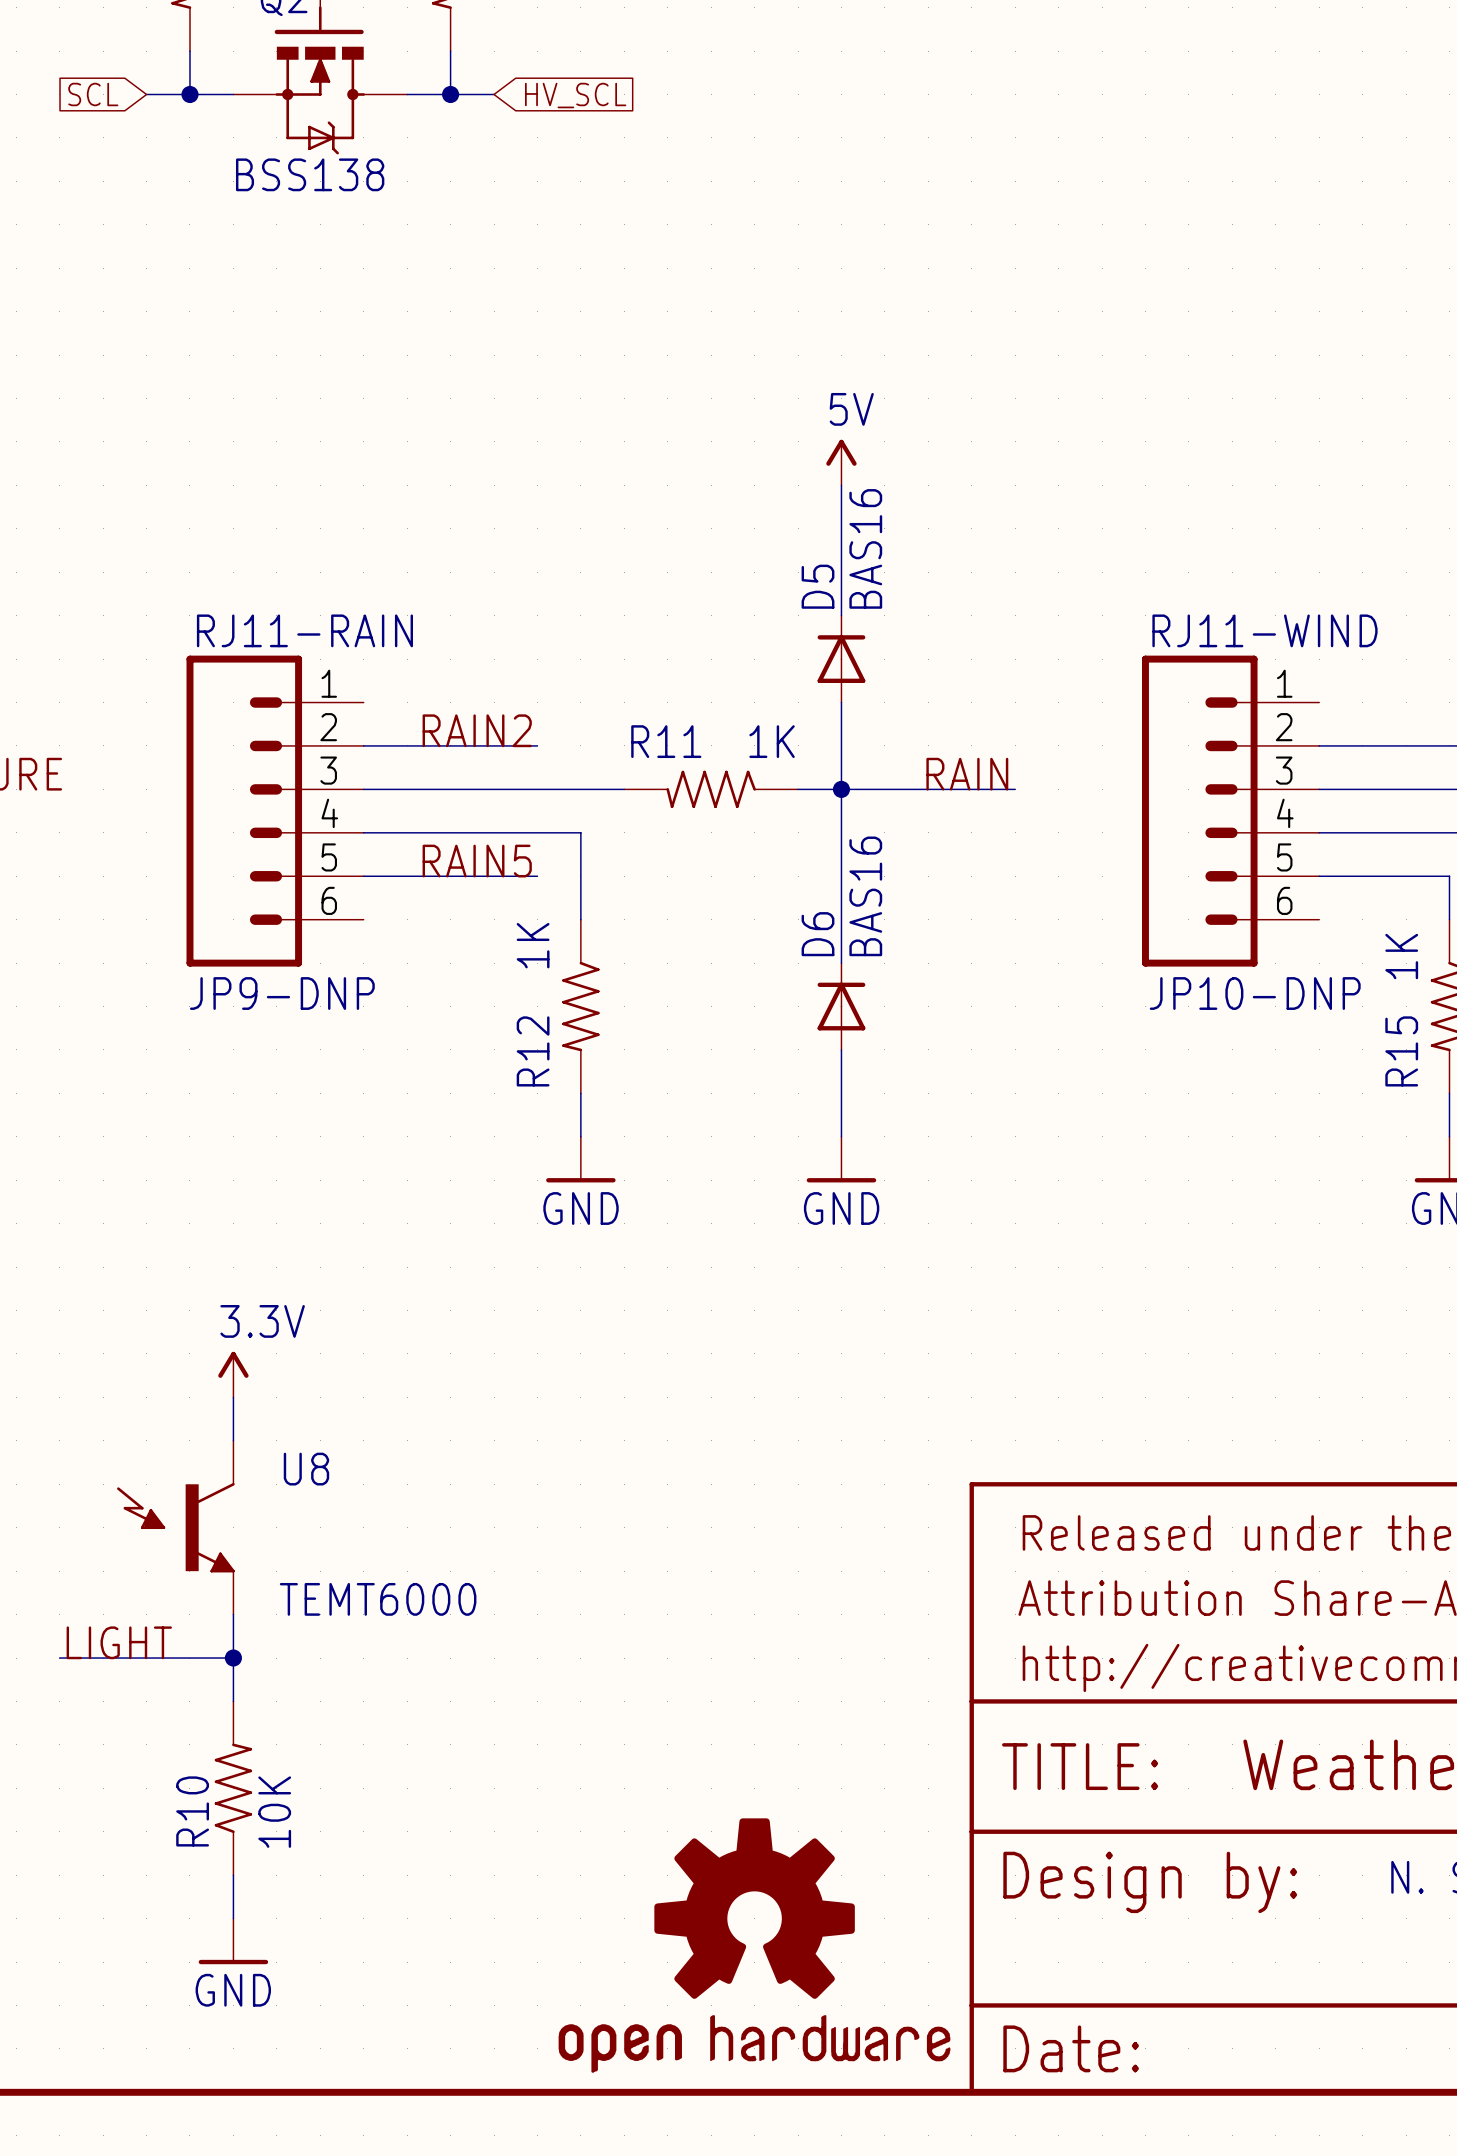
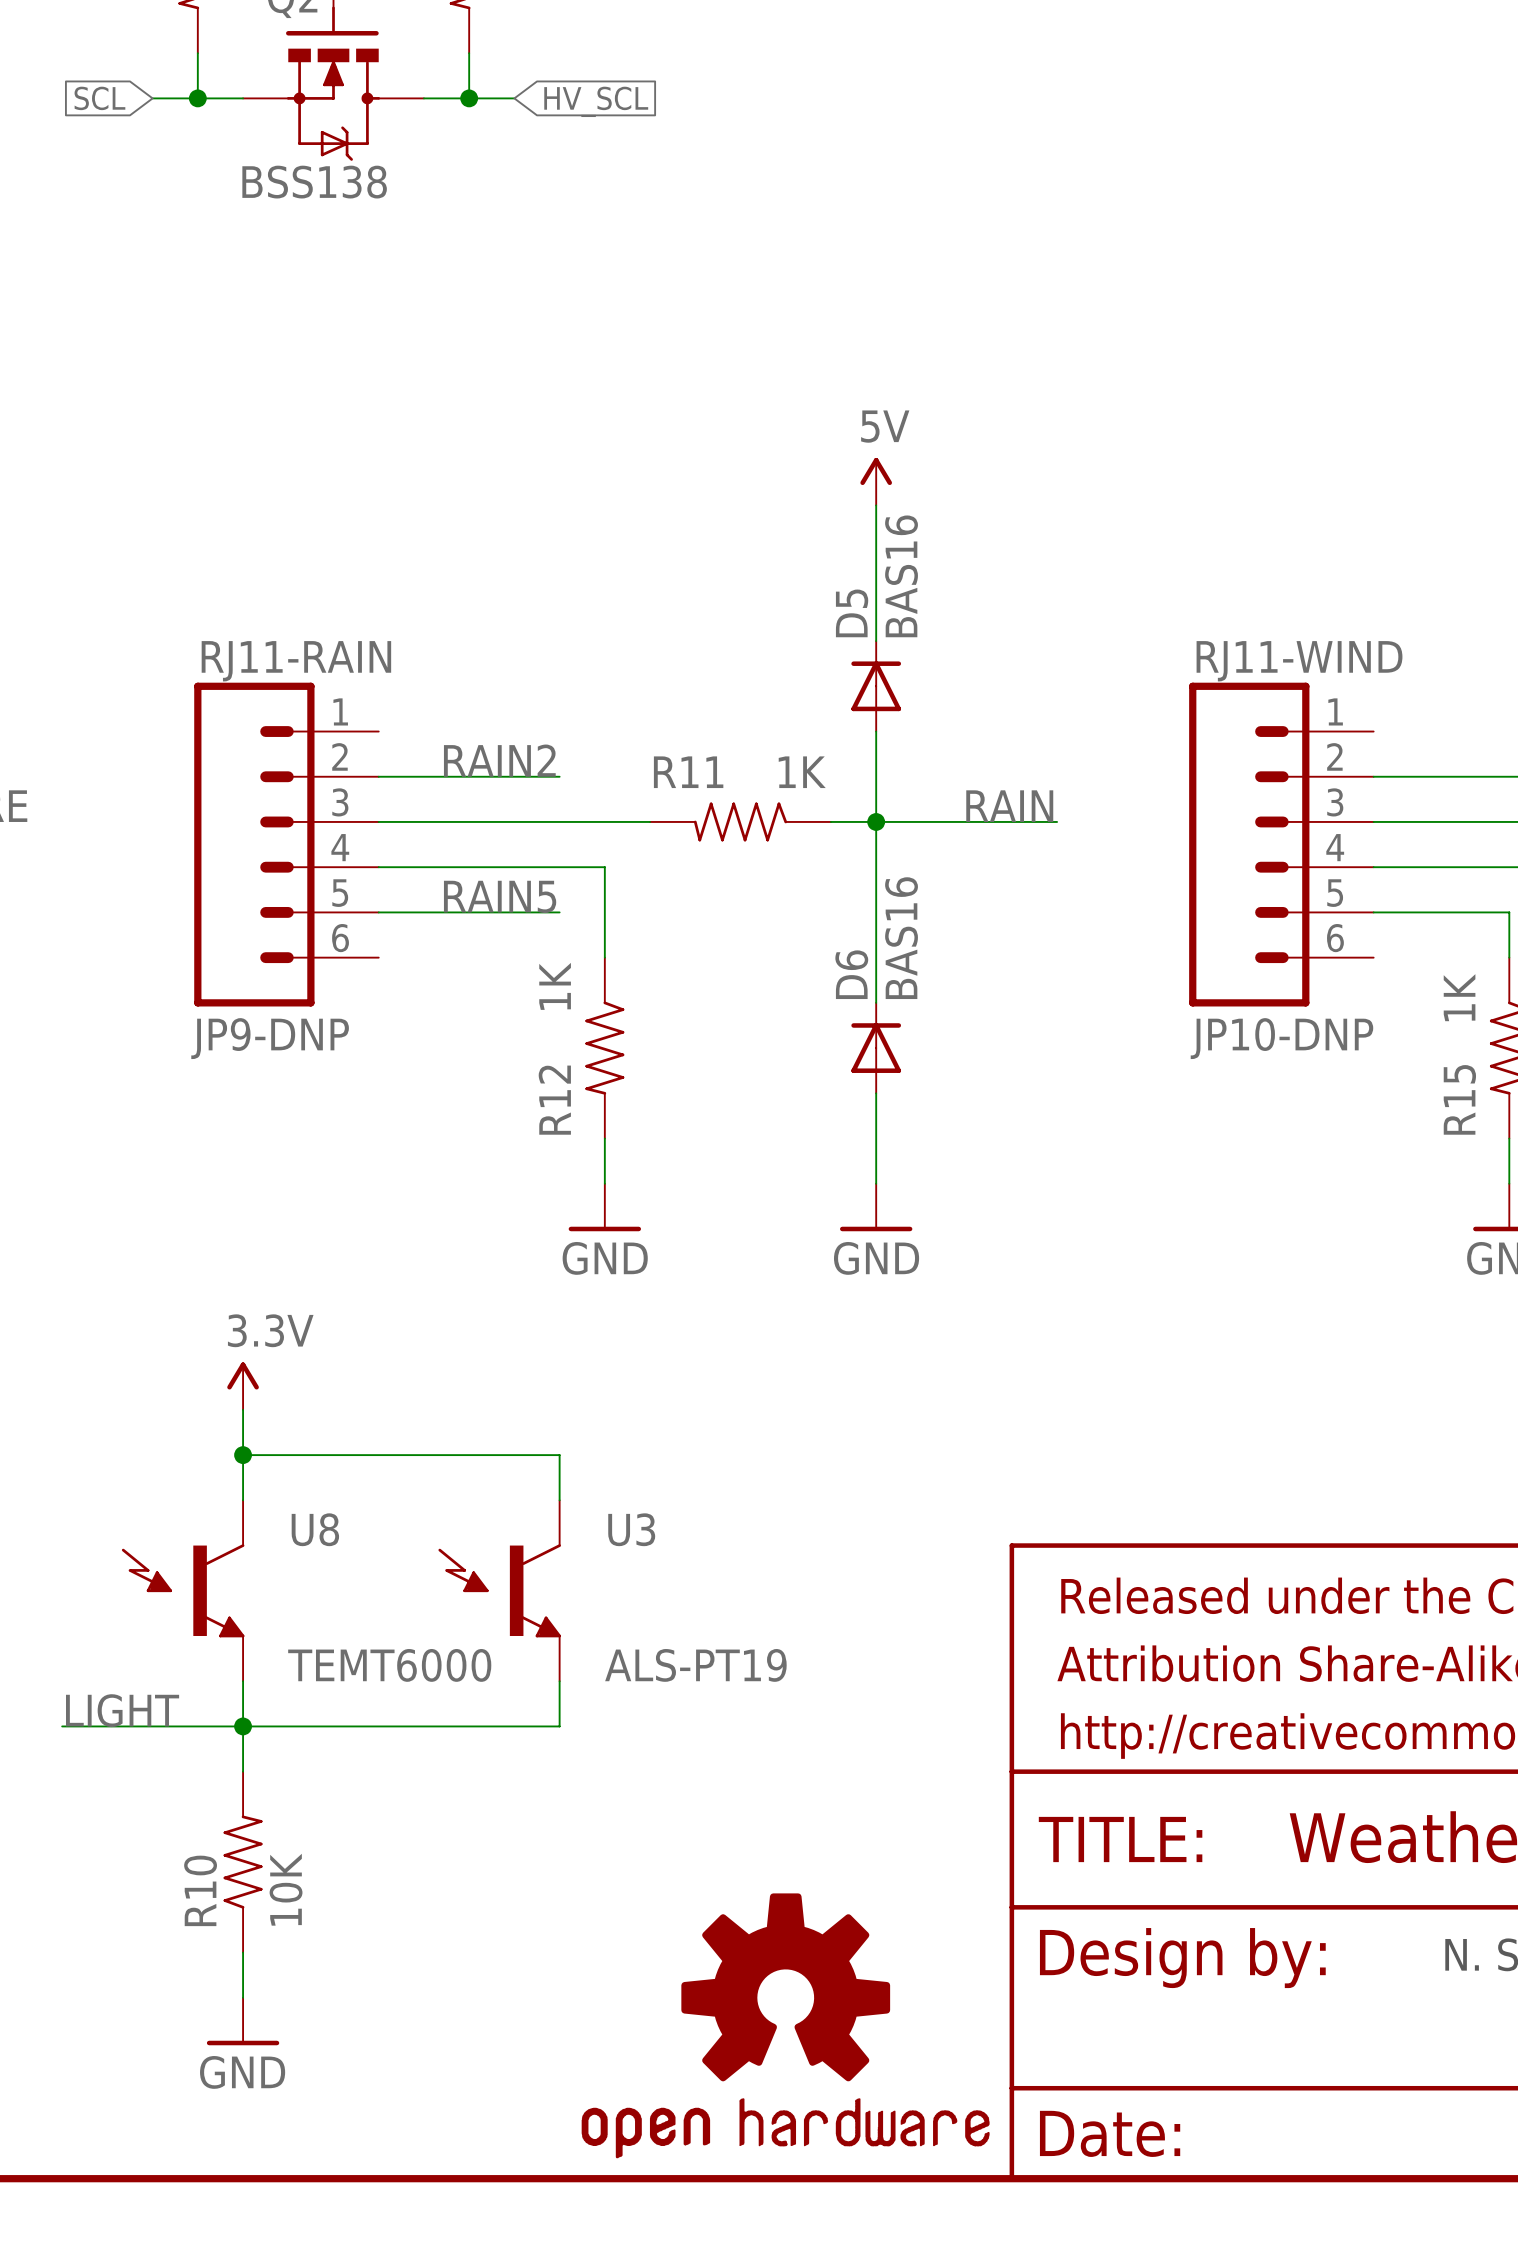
wire: none -> (243, 1409) (243, 1455) (559, 1455) (559, 1500)
power symbol position: 3.3V (233, 1374) -> 3.3V (243, 1386)
junction: none -> (243, 1455)
U3: none -> ALS-PT19 (499, 1590)
wire: none -> (559, 1681) (559, 1726) (243, 1726)

